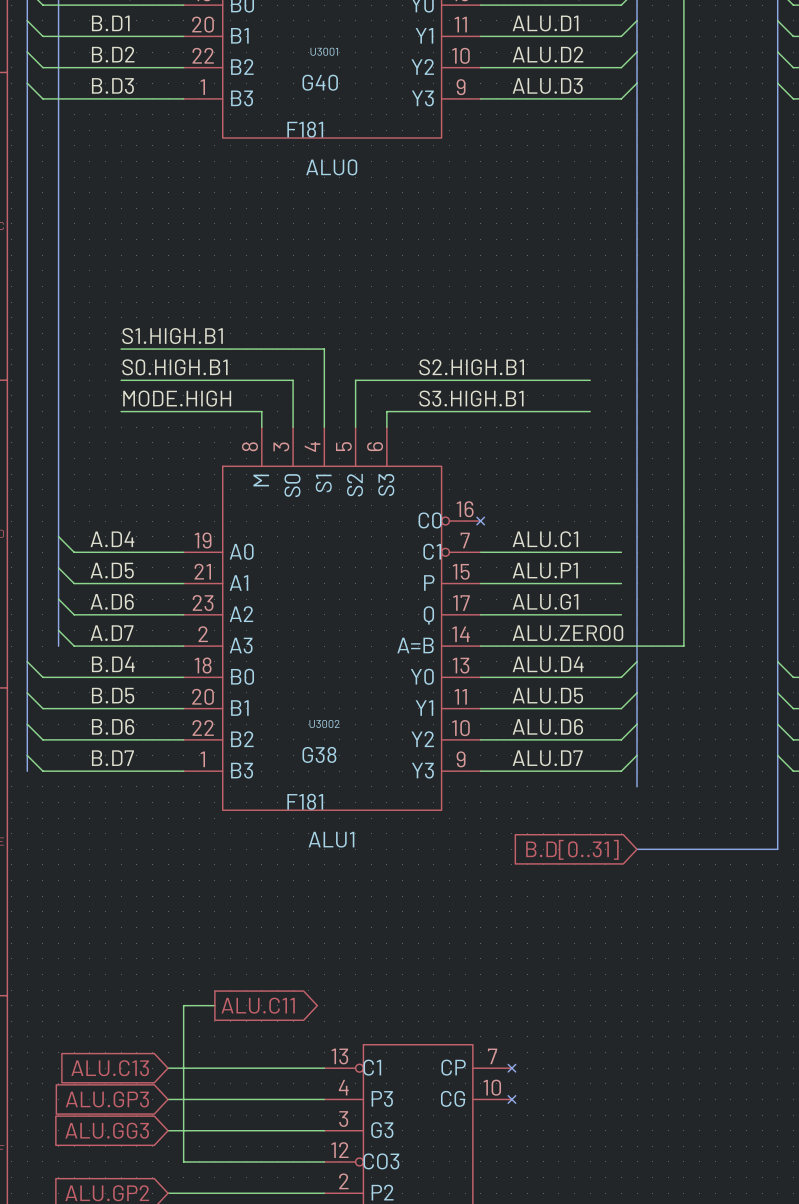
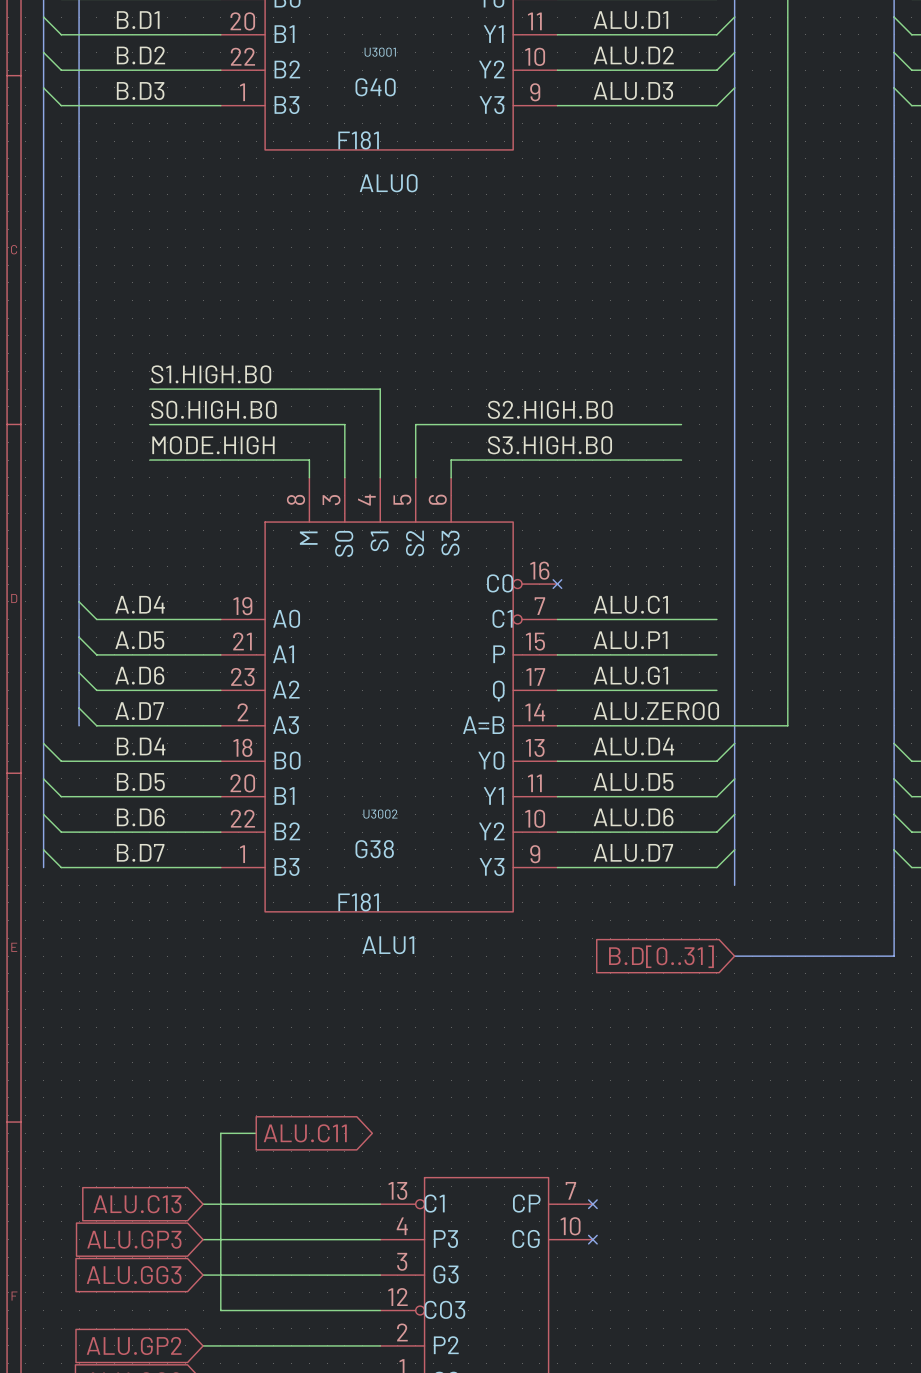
label: S1.HIGH.B1 (172, 336) -> S1.HIGH.B0 (211, 374)
label: S0.HIGH.B1 (174, 367) -> S0.HIGH.B0 (213, 409)
label: S2.HIGH.B1 (471, 367) -> S2.HIGH.B0 (550, 409)
label: S3.HIGH.B1 (471, 398) -> S3.HIGH.B0 (549, 445)

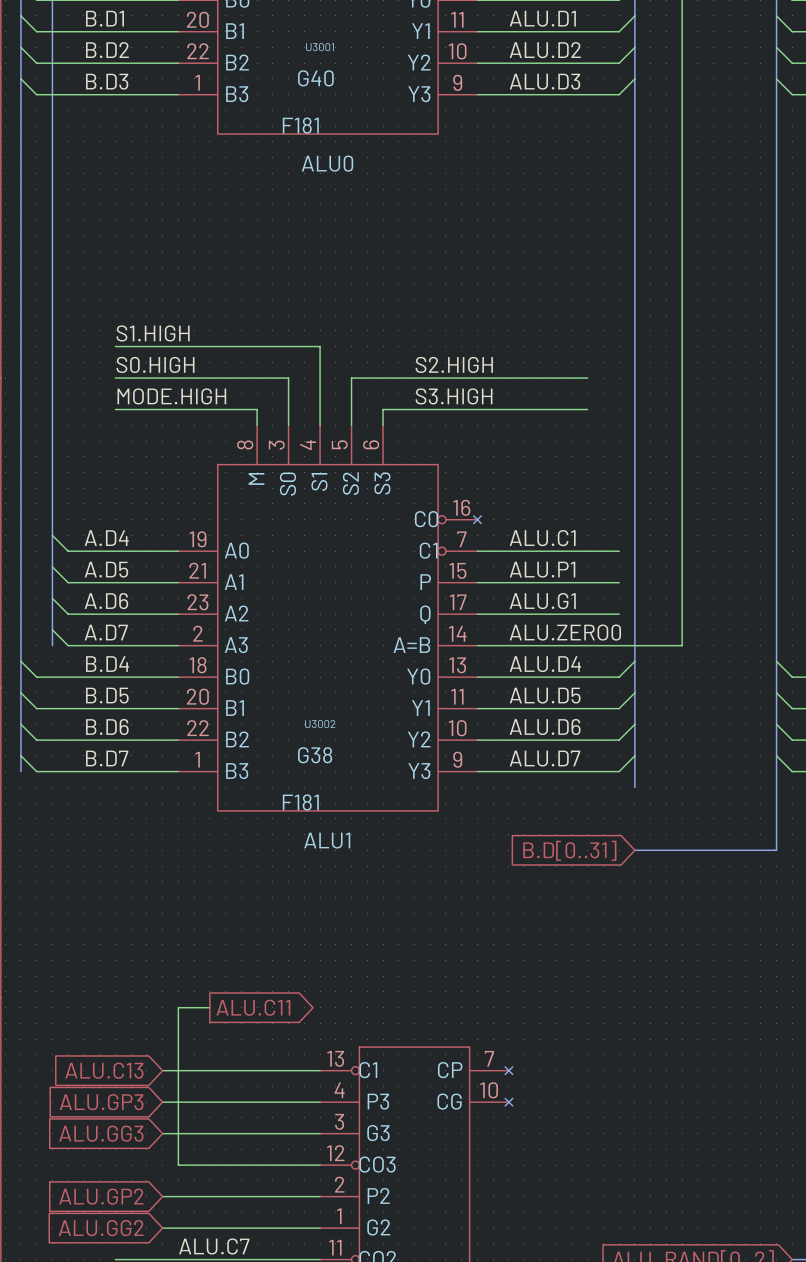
label: S1.HIGH.B0 (211, 374) -> S1.HIGH (153, 333)
label: S0.HIGH.B0 (213, 409) -> S0.HIGH (155, 364)
label: S2.HIGH.B0 (550, 409) -> S2.HIGH (454, 364)
label: S3.HIGH.B0 (549, 445) -> S3.HIGH (454, 396)

